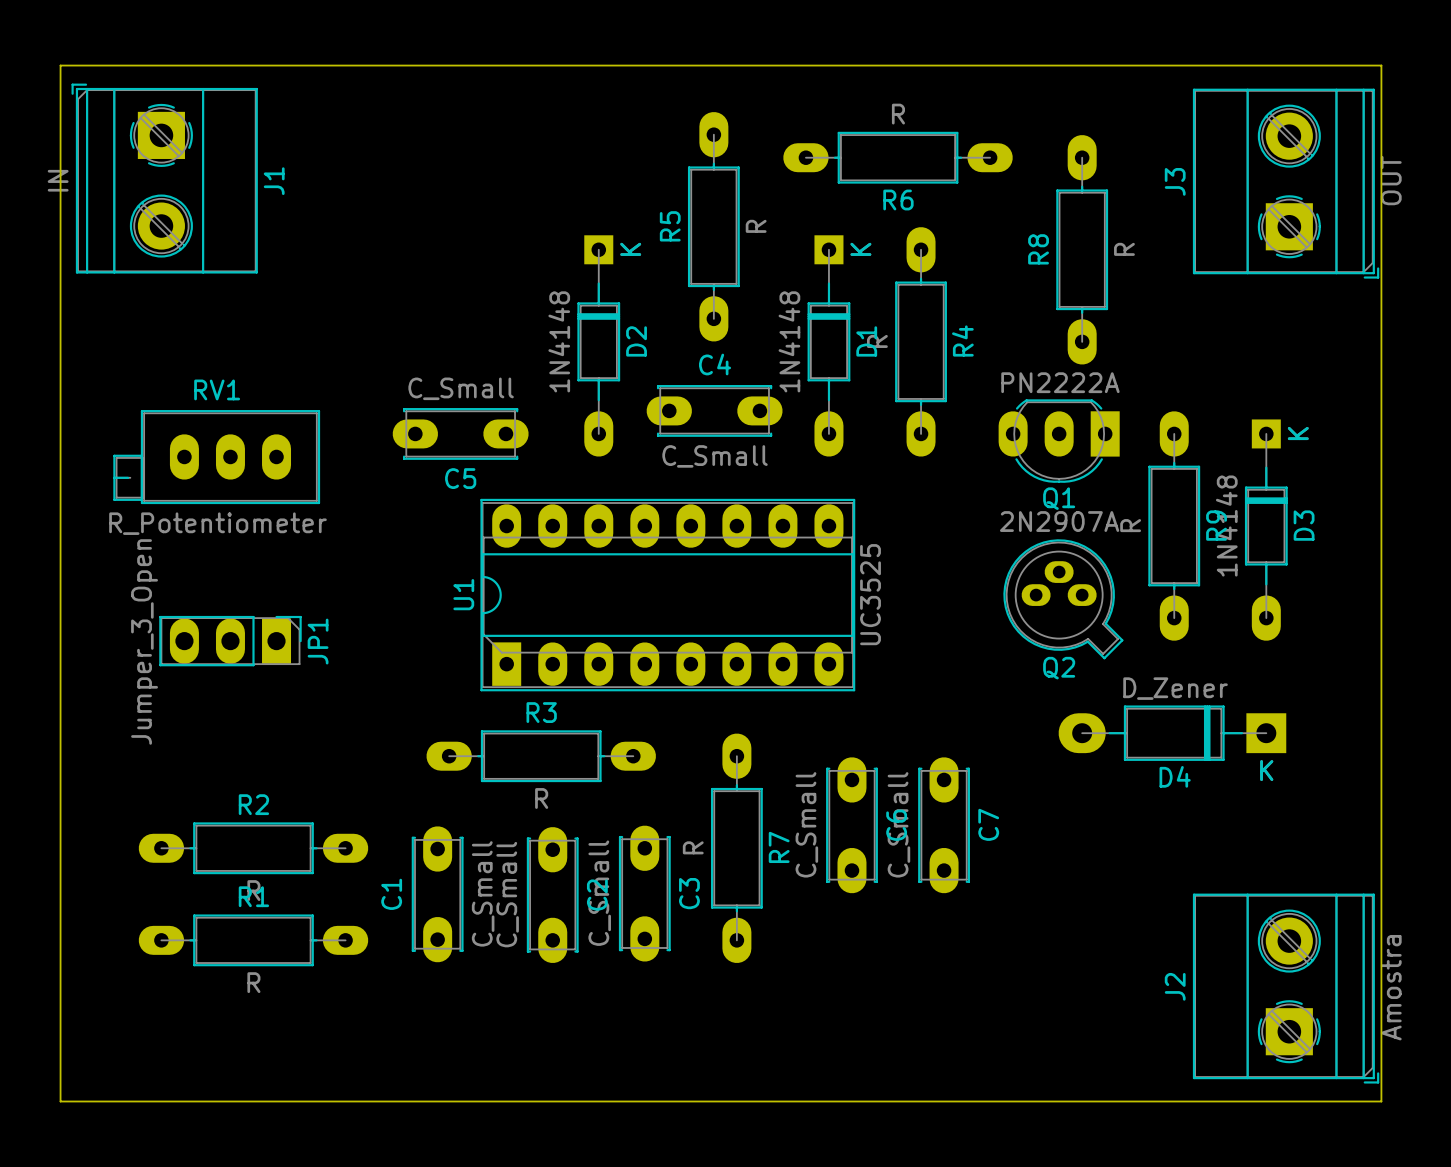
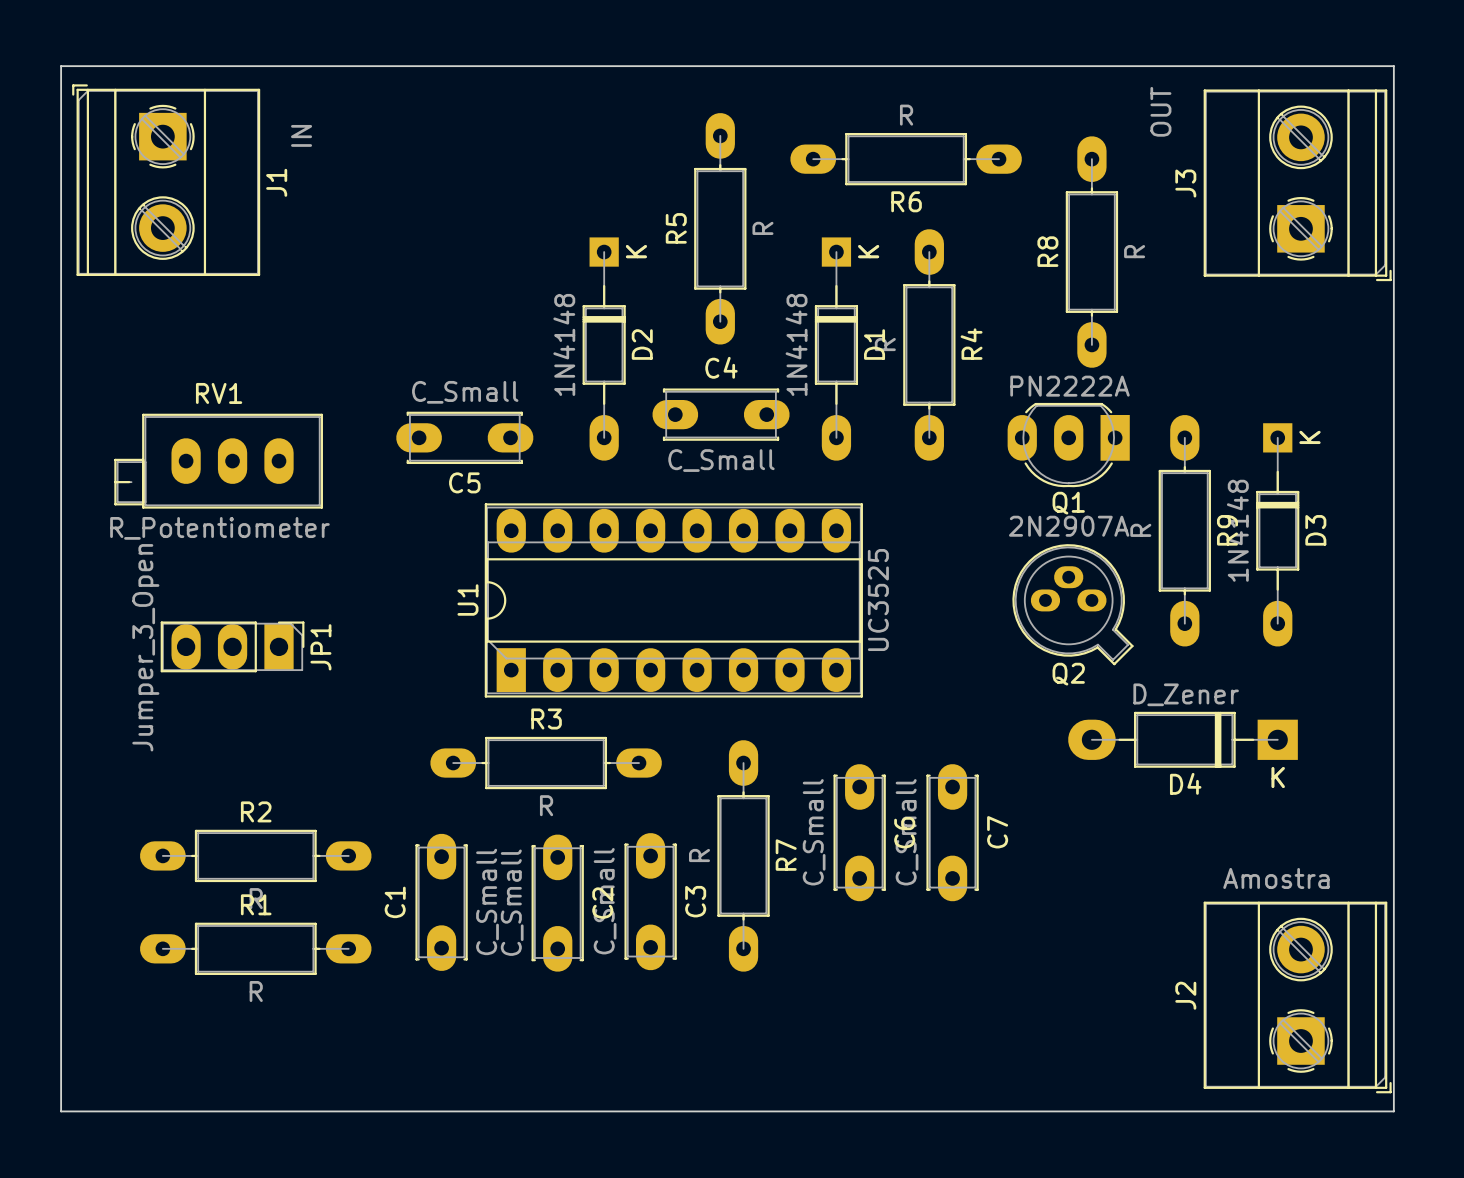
J1 value position: IN (58, 180) -> IN (301, 135)
J3 value position: OUT (1391, 180) -> OUT (1160, 111)
J2 value rotation: 0° (1391, 987) -> 90° clockwise (1276, 878)
J2 value position: Amostra (1391, 987) -> Amostra (1276, 878)

